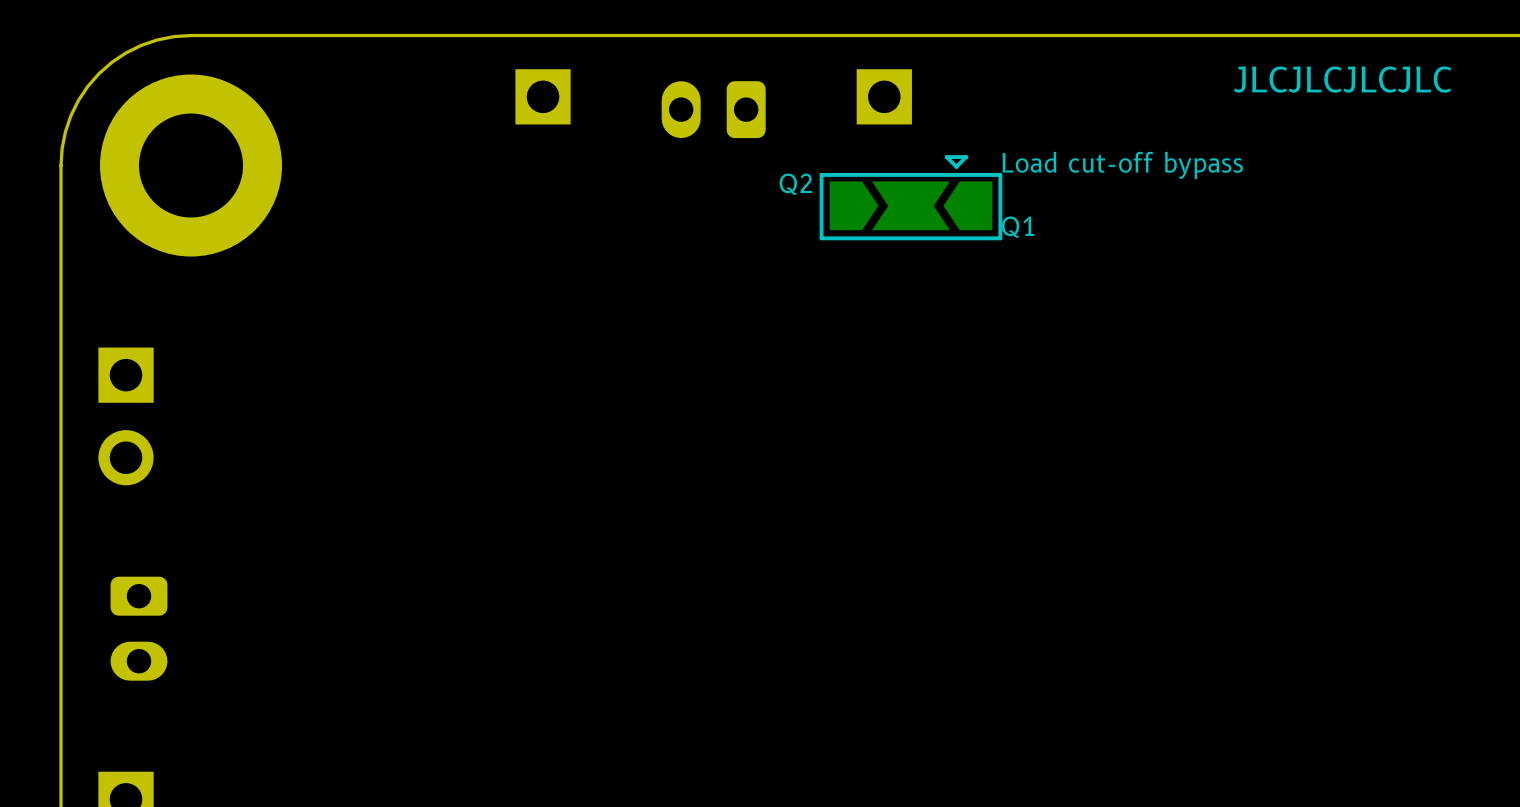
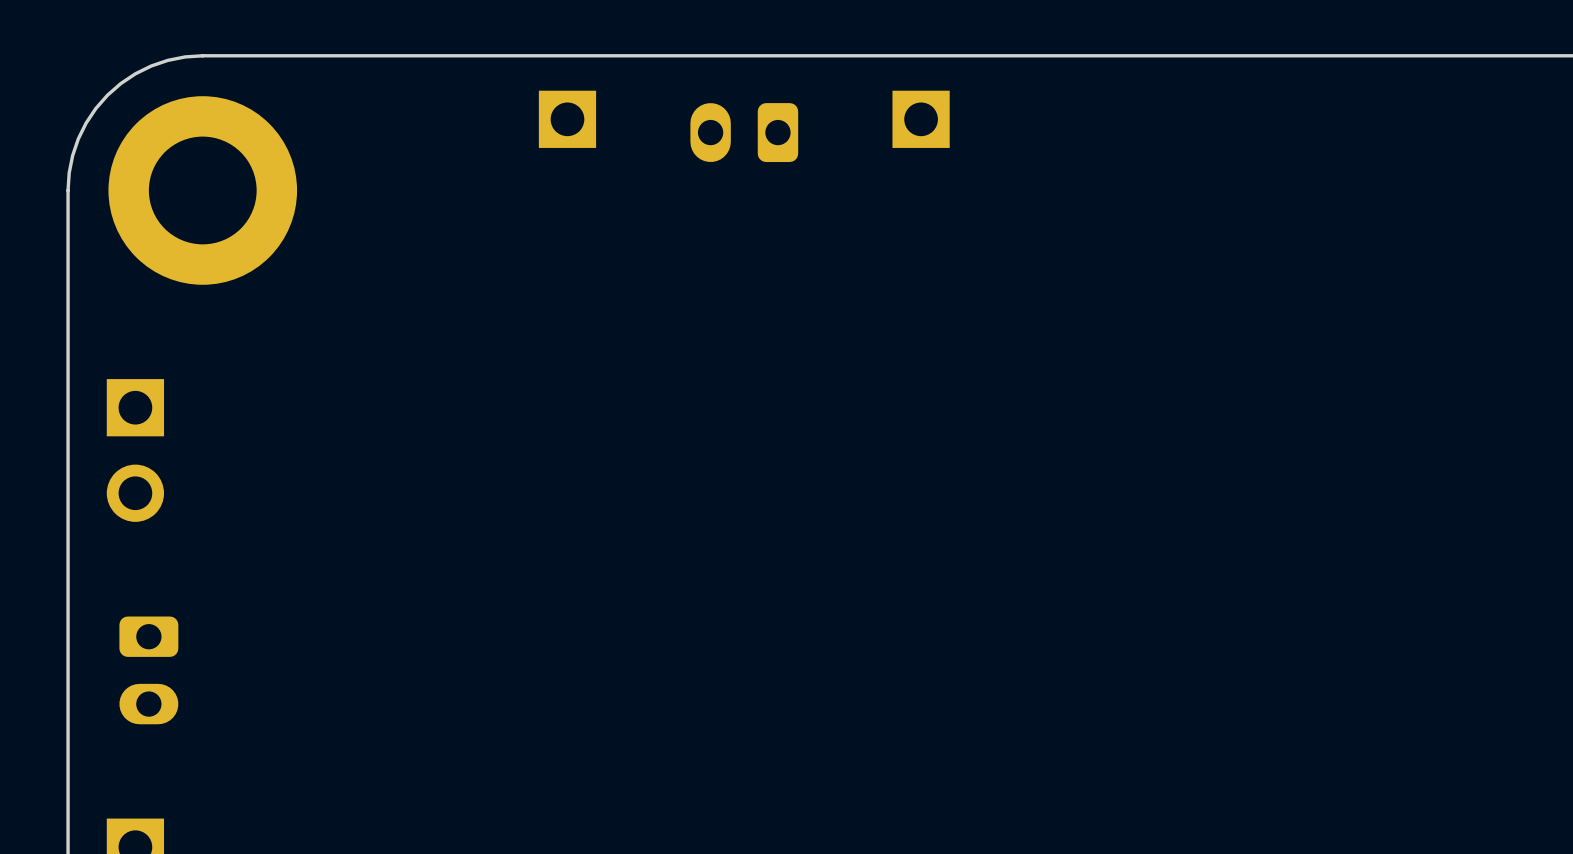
text: JLCJLCJLCJLC (1342, 79) -> none
text: Load cut-off bypass (1122, 165) -> none
text: Q2 (795, 184) -> none
part: (910, 197) -> none
text: Q1 (1018, 227) -> none

